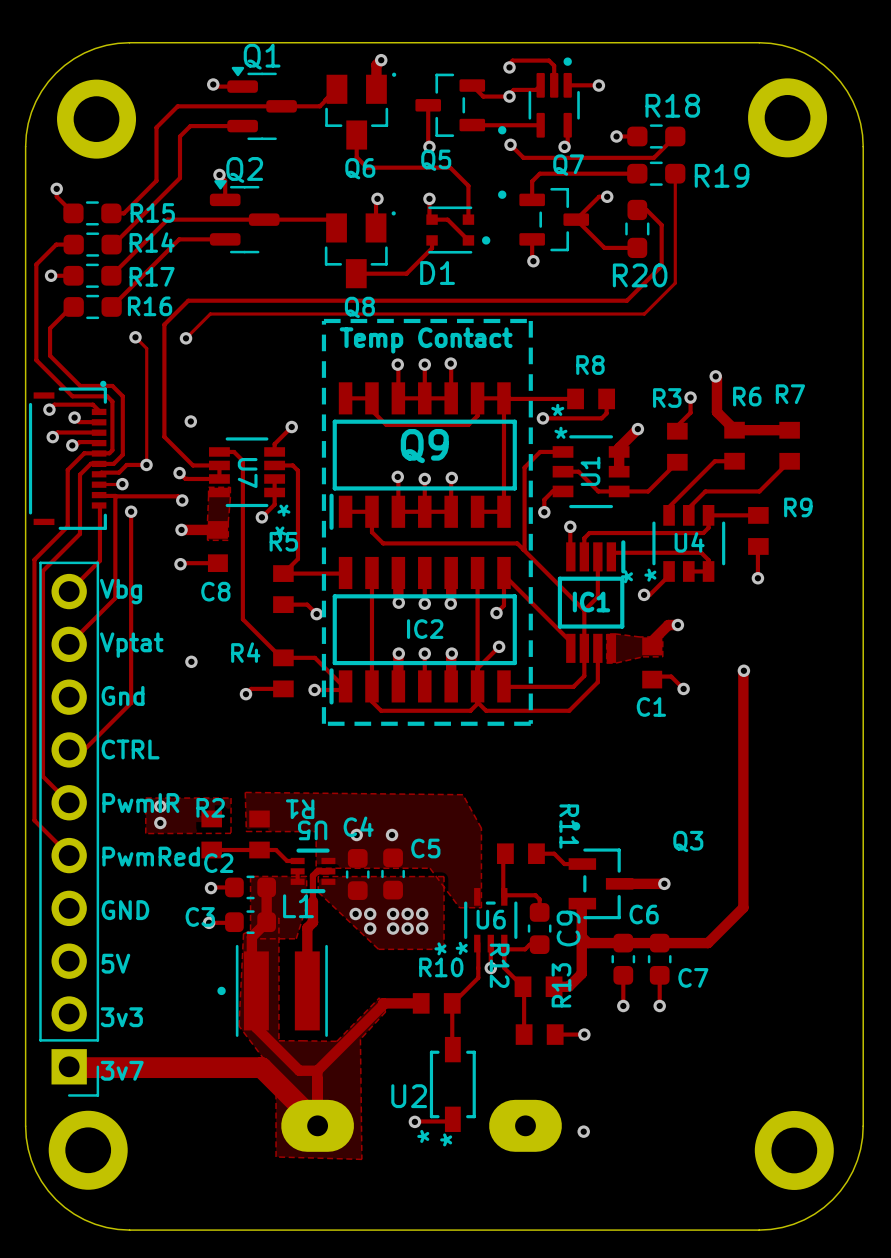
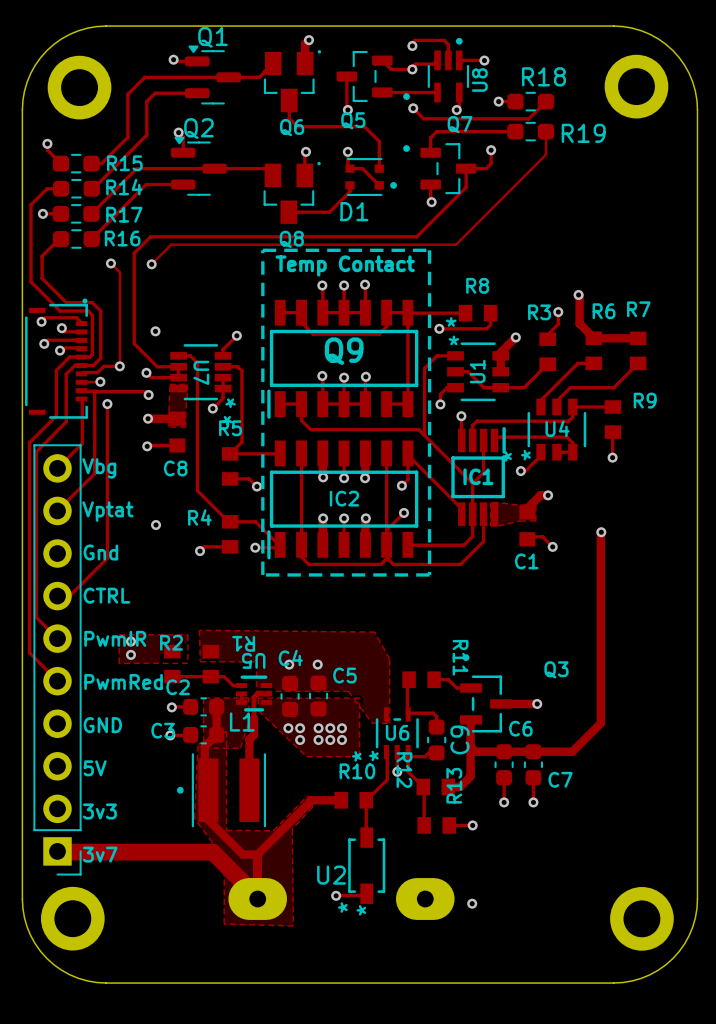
U8 name: none -> U8 (479, 80)
track: (607, 196) (599, 196) (576, 219) (604, 247) (637, 247) -> none
track: (675, 202) (675, 283) (644, 314) (563, 314) -> (546, 154) (455, 244)
track: (637, 209) (646, 209) (661, 225) (661, 265) (626, 300) (188, 300) (184, 304) -> (491, 150) (491, 163) (486, 168) (466, 168) (466, 187) (416, 236) (150, 236)
R20: (637, 228) -> none

